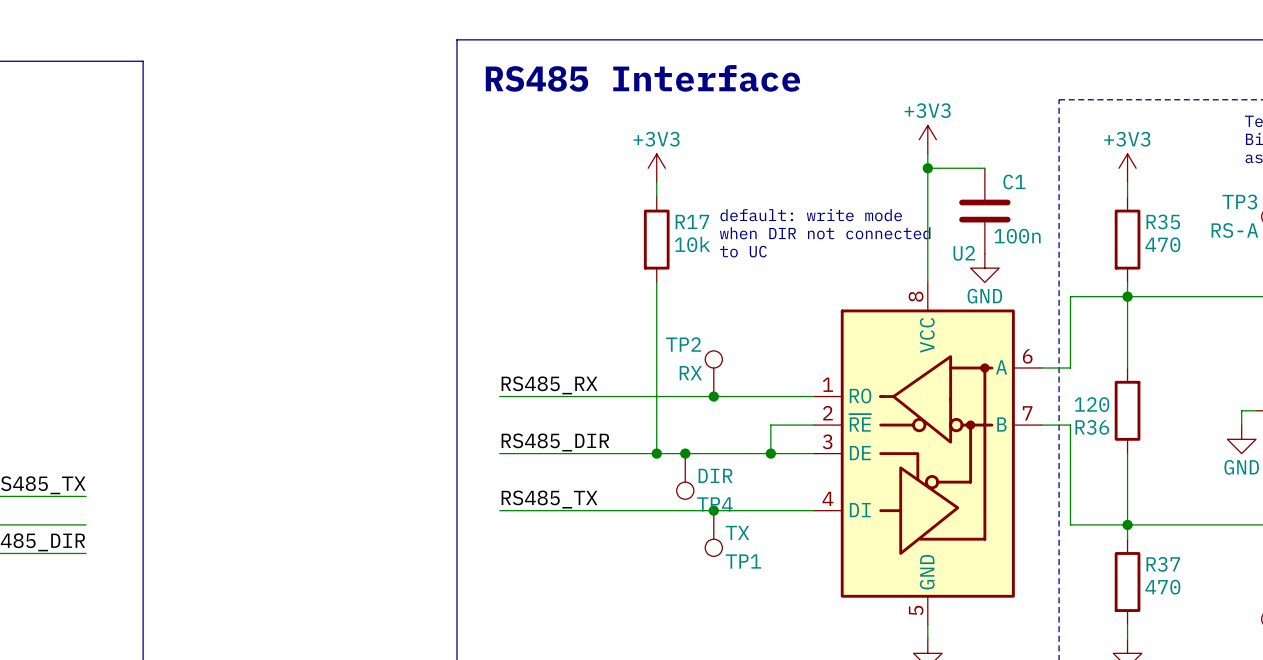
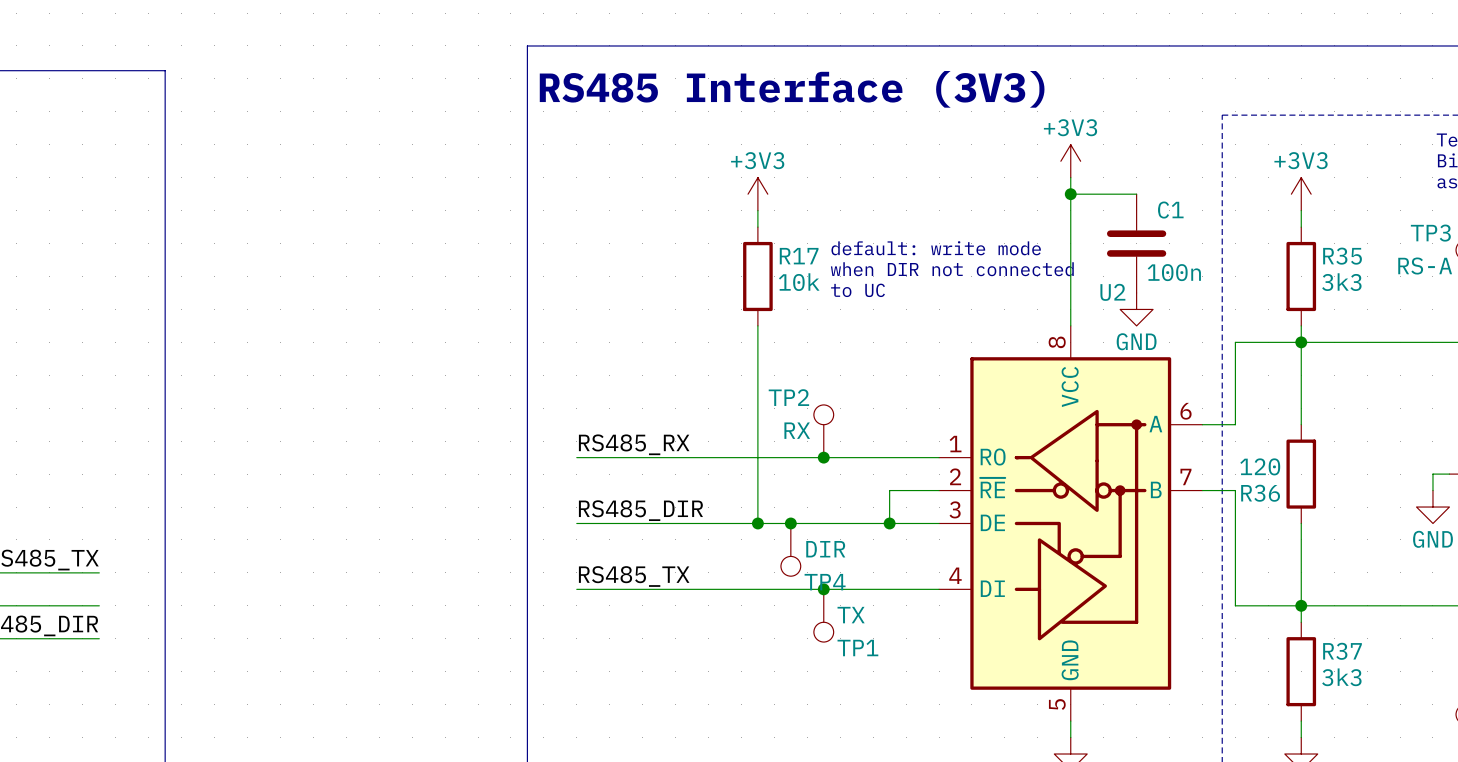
text: RS485 Interface (642, 78) -> RS485 Interface (3V3) (792, 89)
R35 value: 470 (1162, 244) -> 3k3 (1341, 282)
R37 value: 470 (1162, 587) -> 3k3 (1341, 677)

